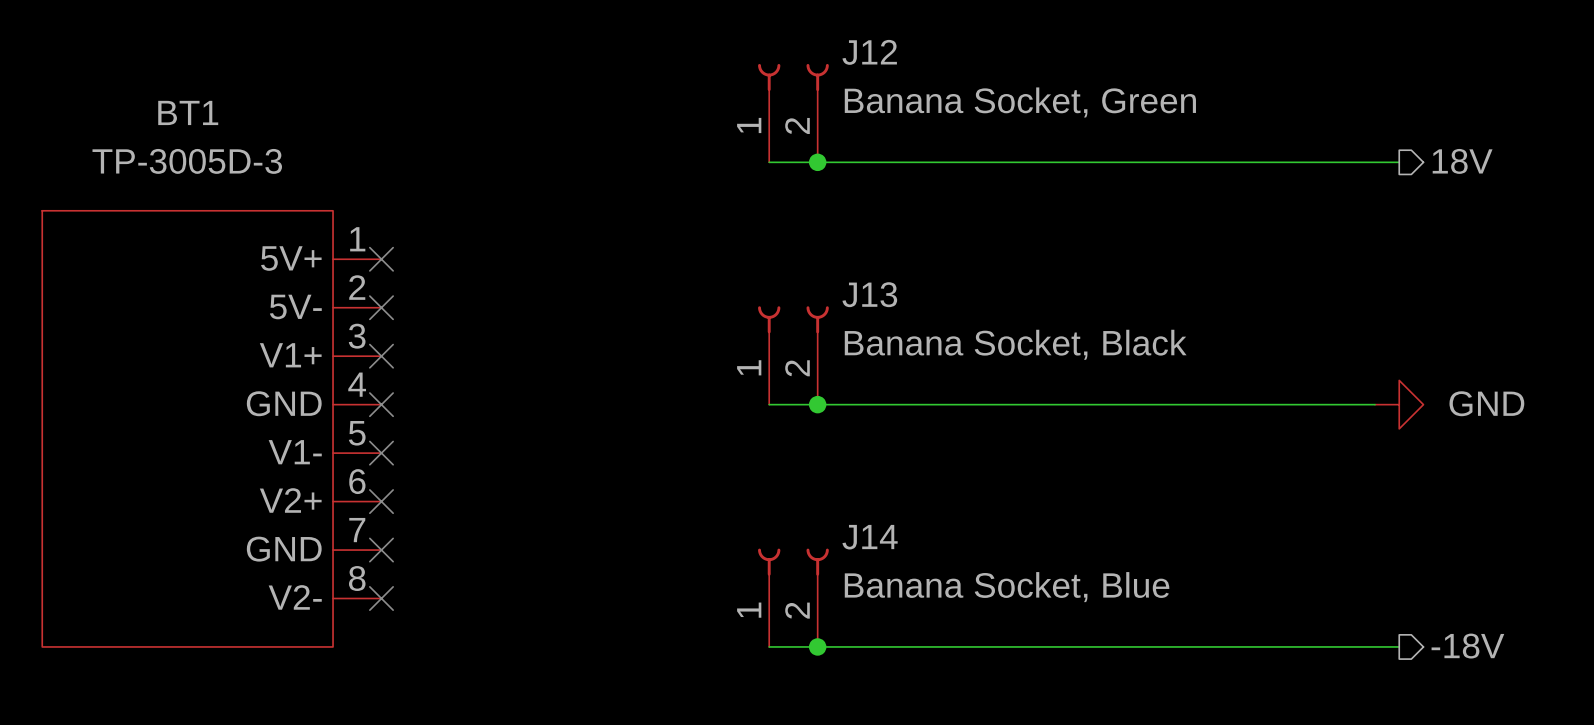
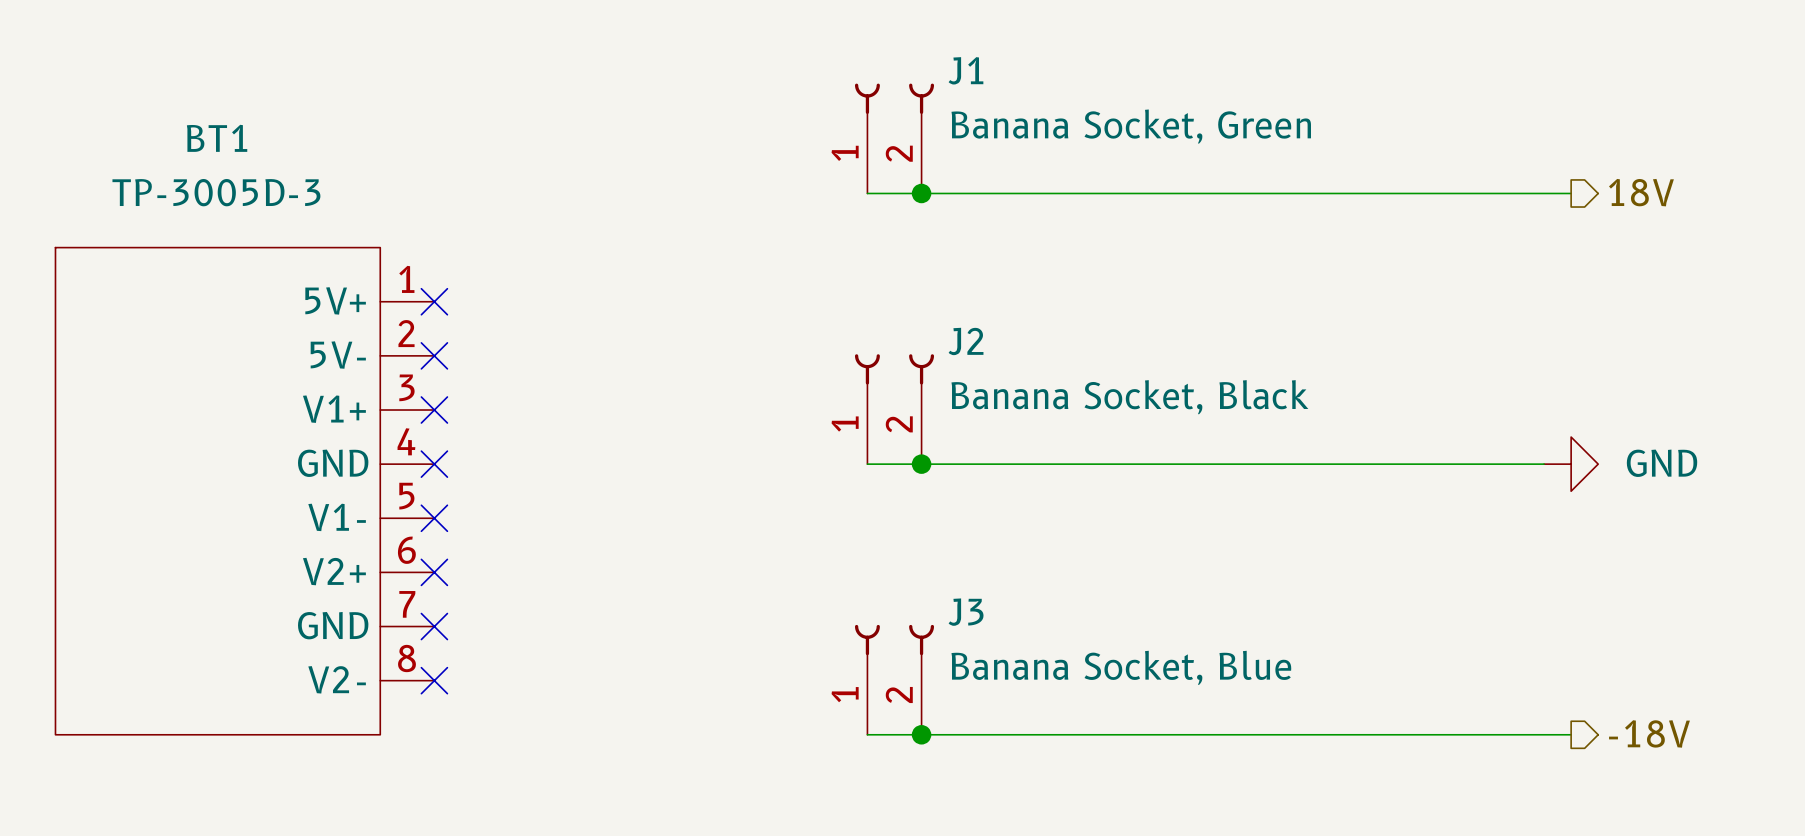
J12 name: J12 (869, 52) -> J1 (965, 70)
J13 name: J13 (869, 294) -> J2 (966, 341)
J14 name: J14 (870, 537) -> J3 (966, 612)

